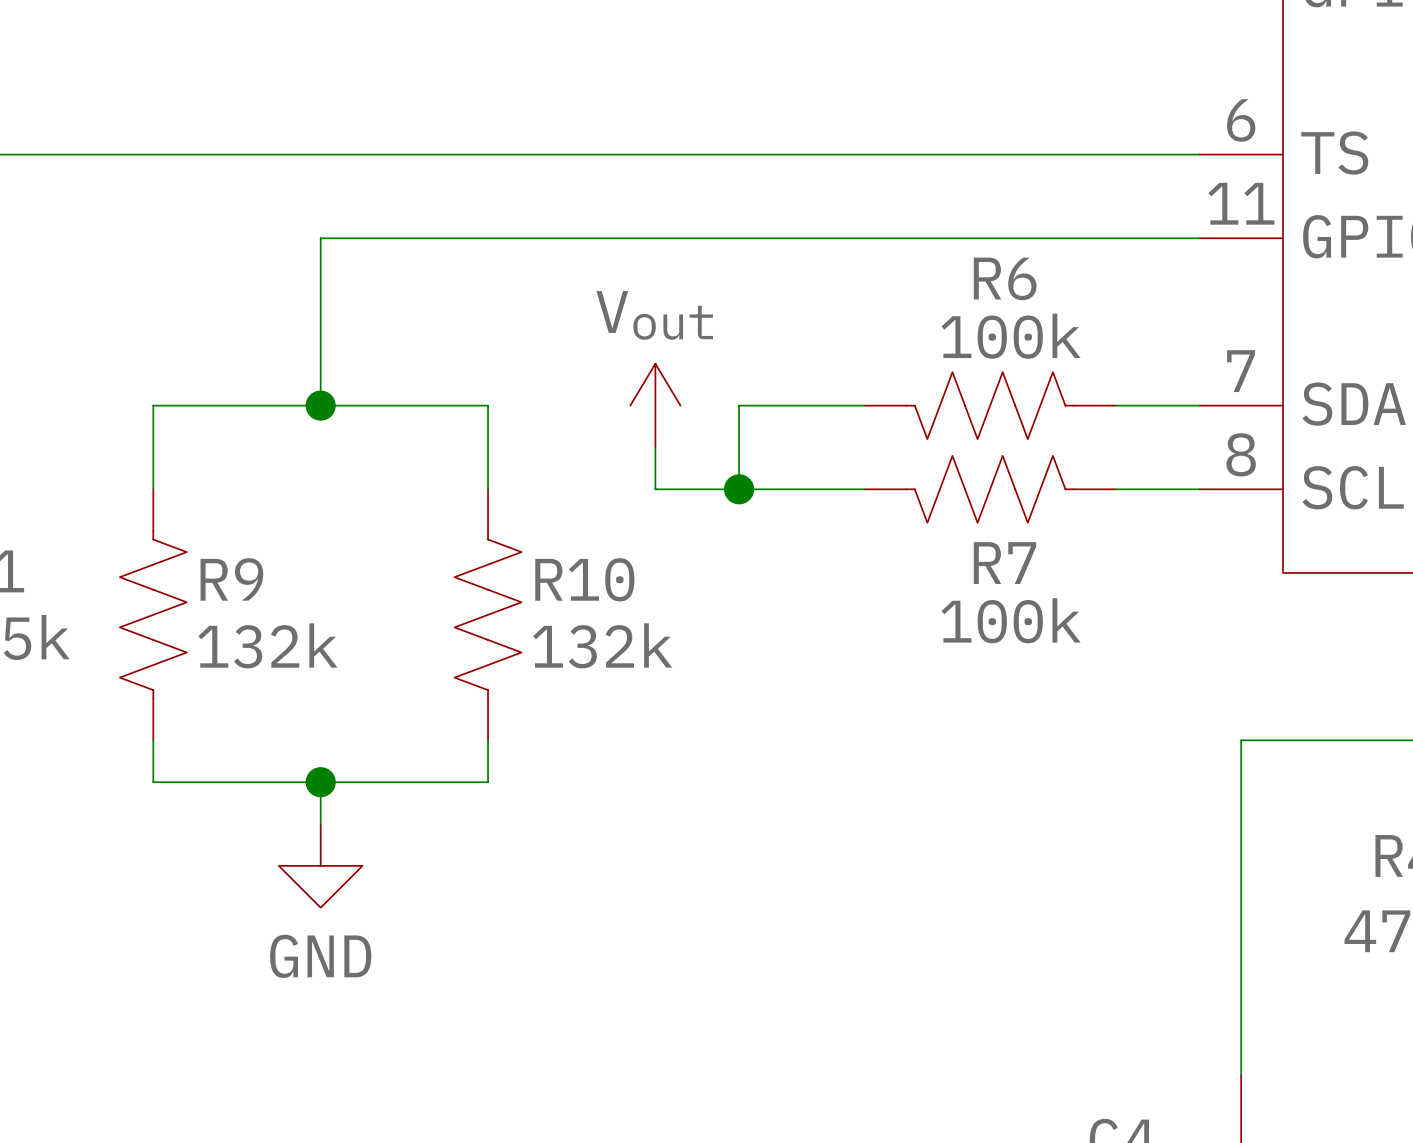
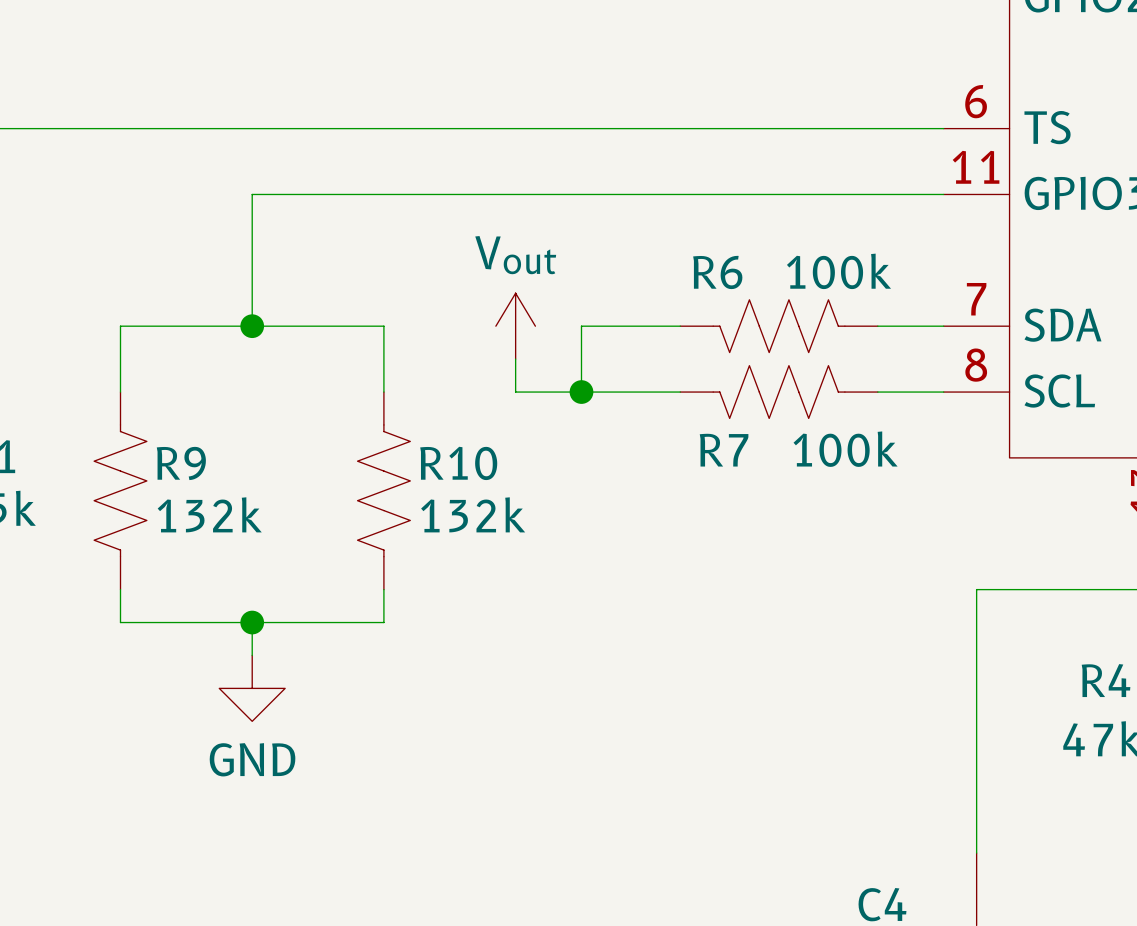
R6 name position: R6 (1005, 278) -> R6 (717, 272)
R6 value position: 100k (1011, 336) -> 100k (838, 271)
R7 name position: R7 (1005, 563) -> R7 (724, 450)
R7 value position: 100k (1011, 620) -> 100k (845, 449)

